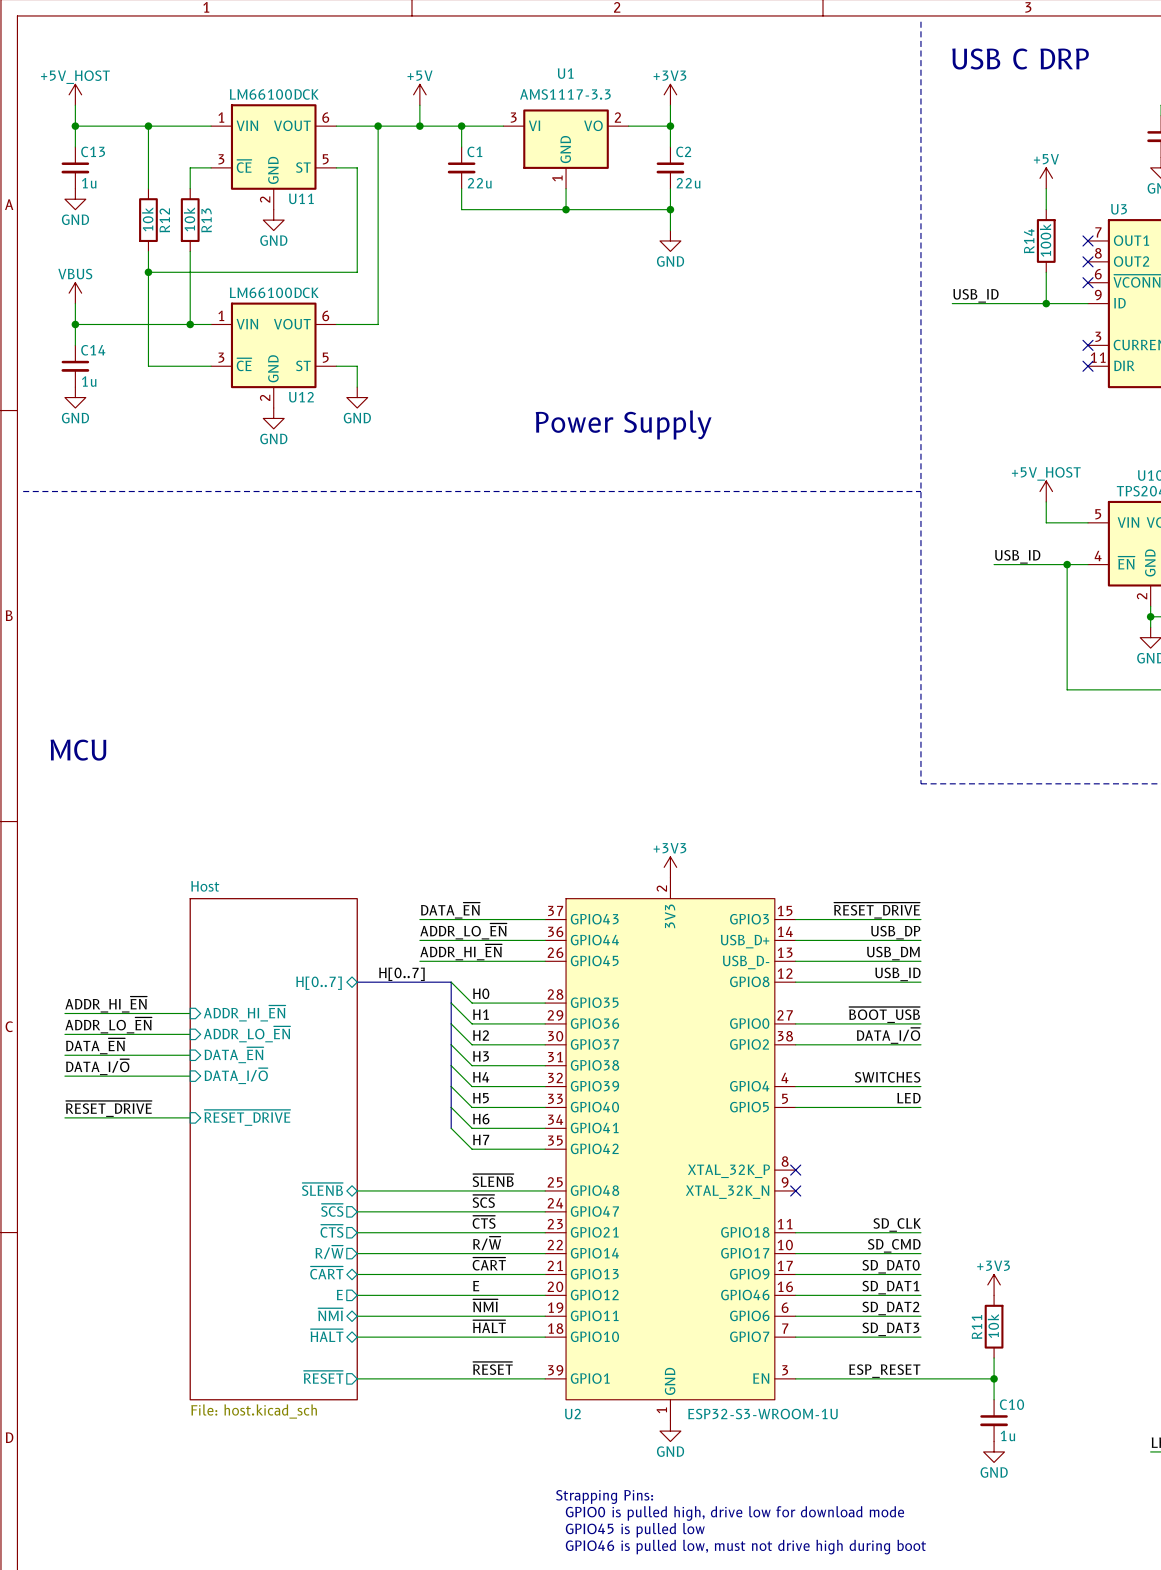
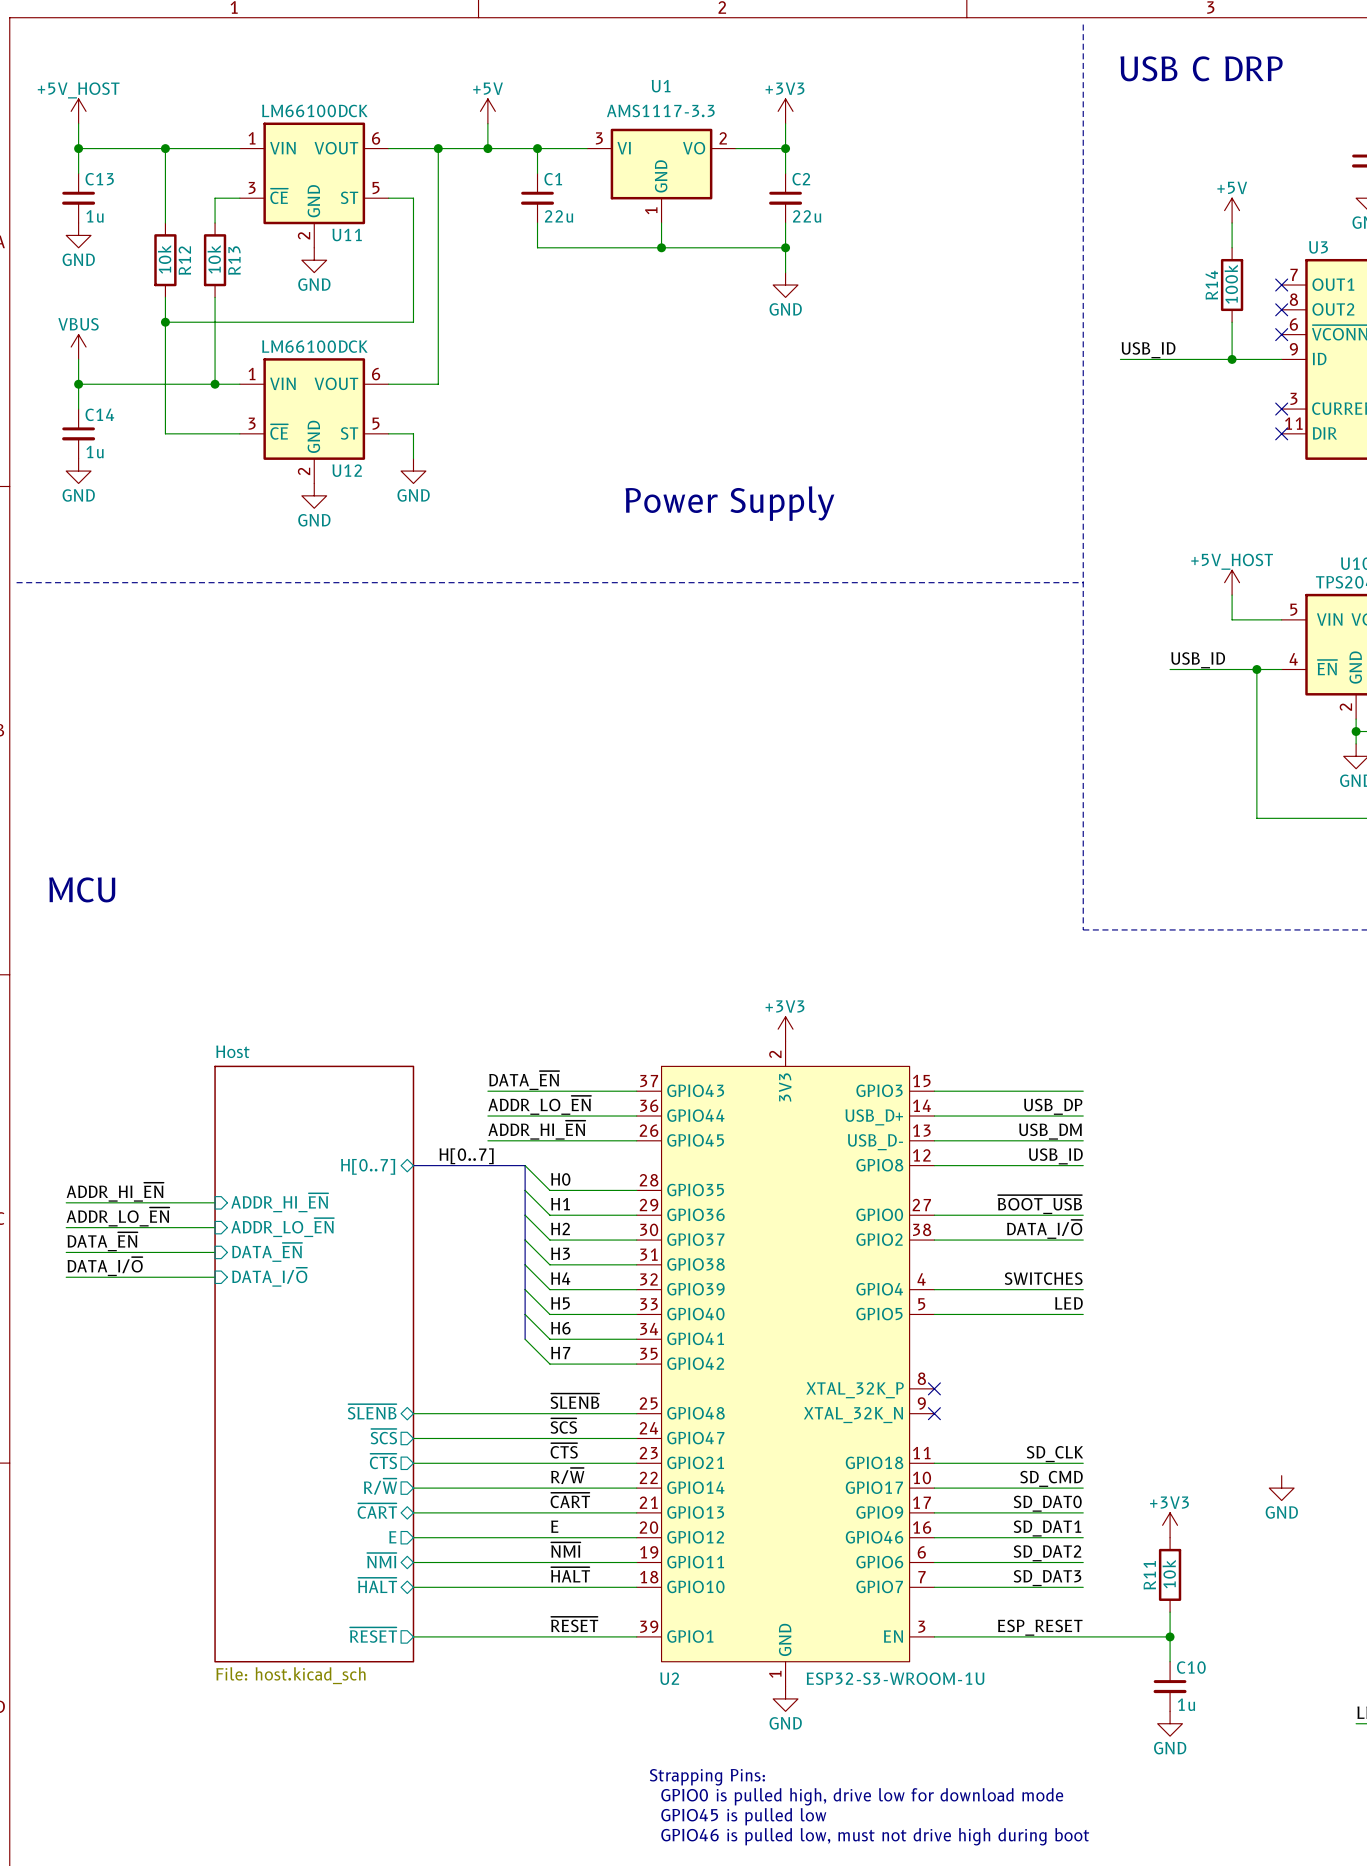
label: ~{RESET_DRIVE} (877, 910) -> none
label: ~{RESET_DRIVE} (108, 1108) -> none
wire: (64, 1117) (190, 1117) -> none
sheet pin: ~{RESET_DRIVE} (247, 1117) -> none
power symbol: none -> GND (1281, 1488)

